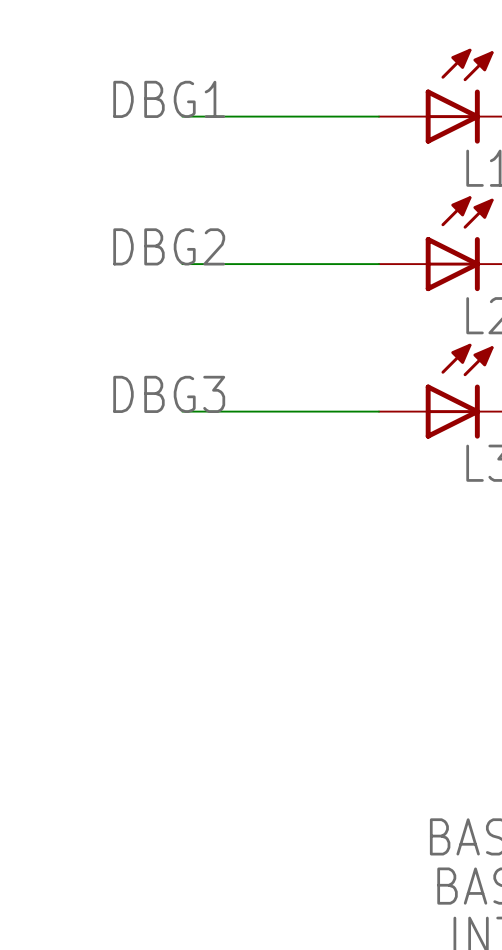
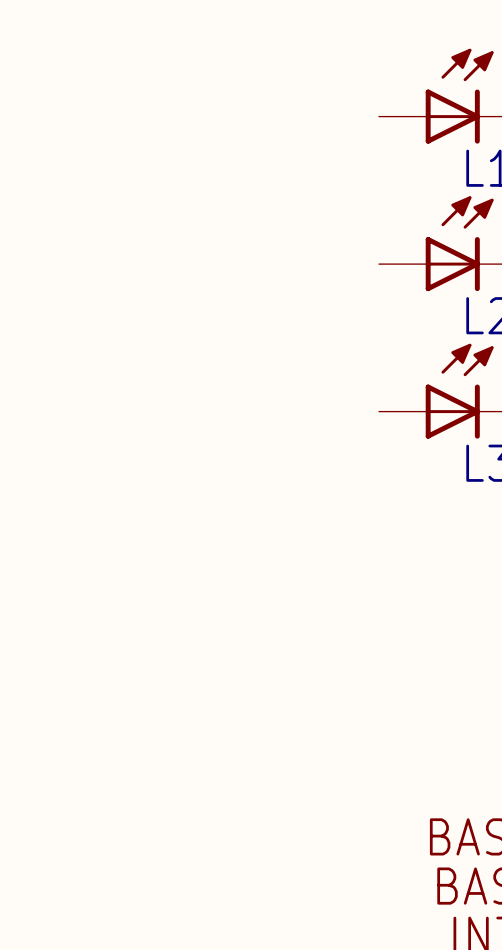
label: DBG1 (169, 99) -> none
wire: (182, 116) (379, 116) -> none
label: DBG2 (169, 246) -> none
wire: (182, 264) (379, 264) -> none
label: DBG3 (169, 394) -> none
wire: (182, 411) (379, 411) -> none

